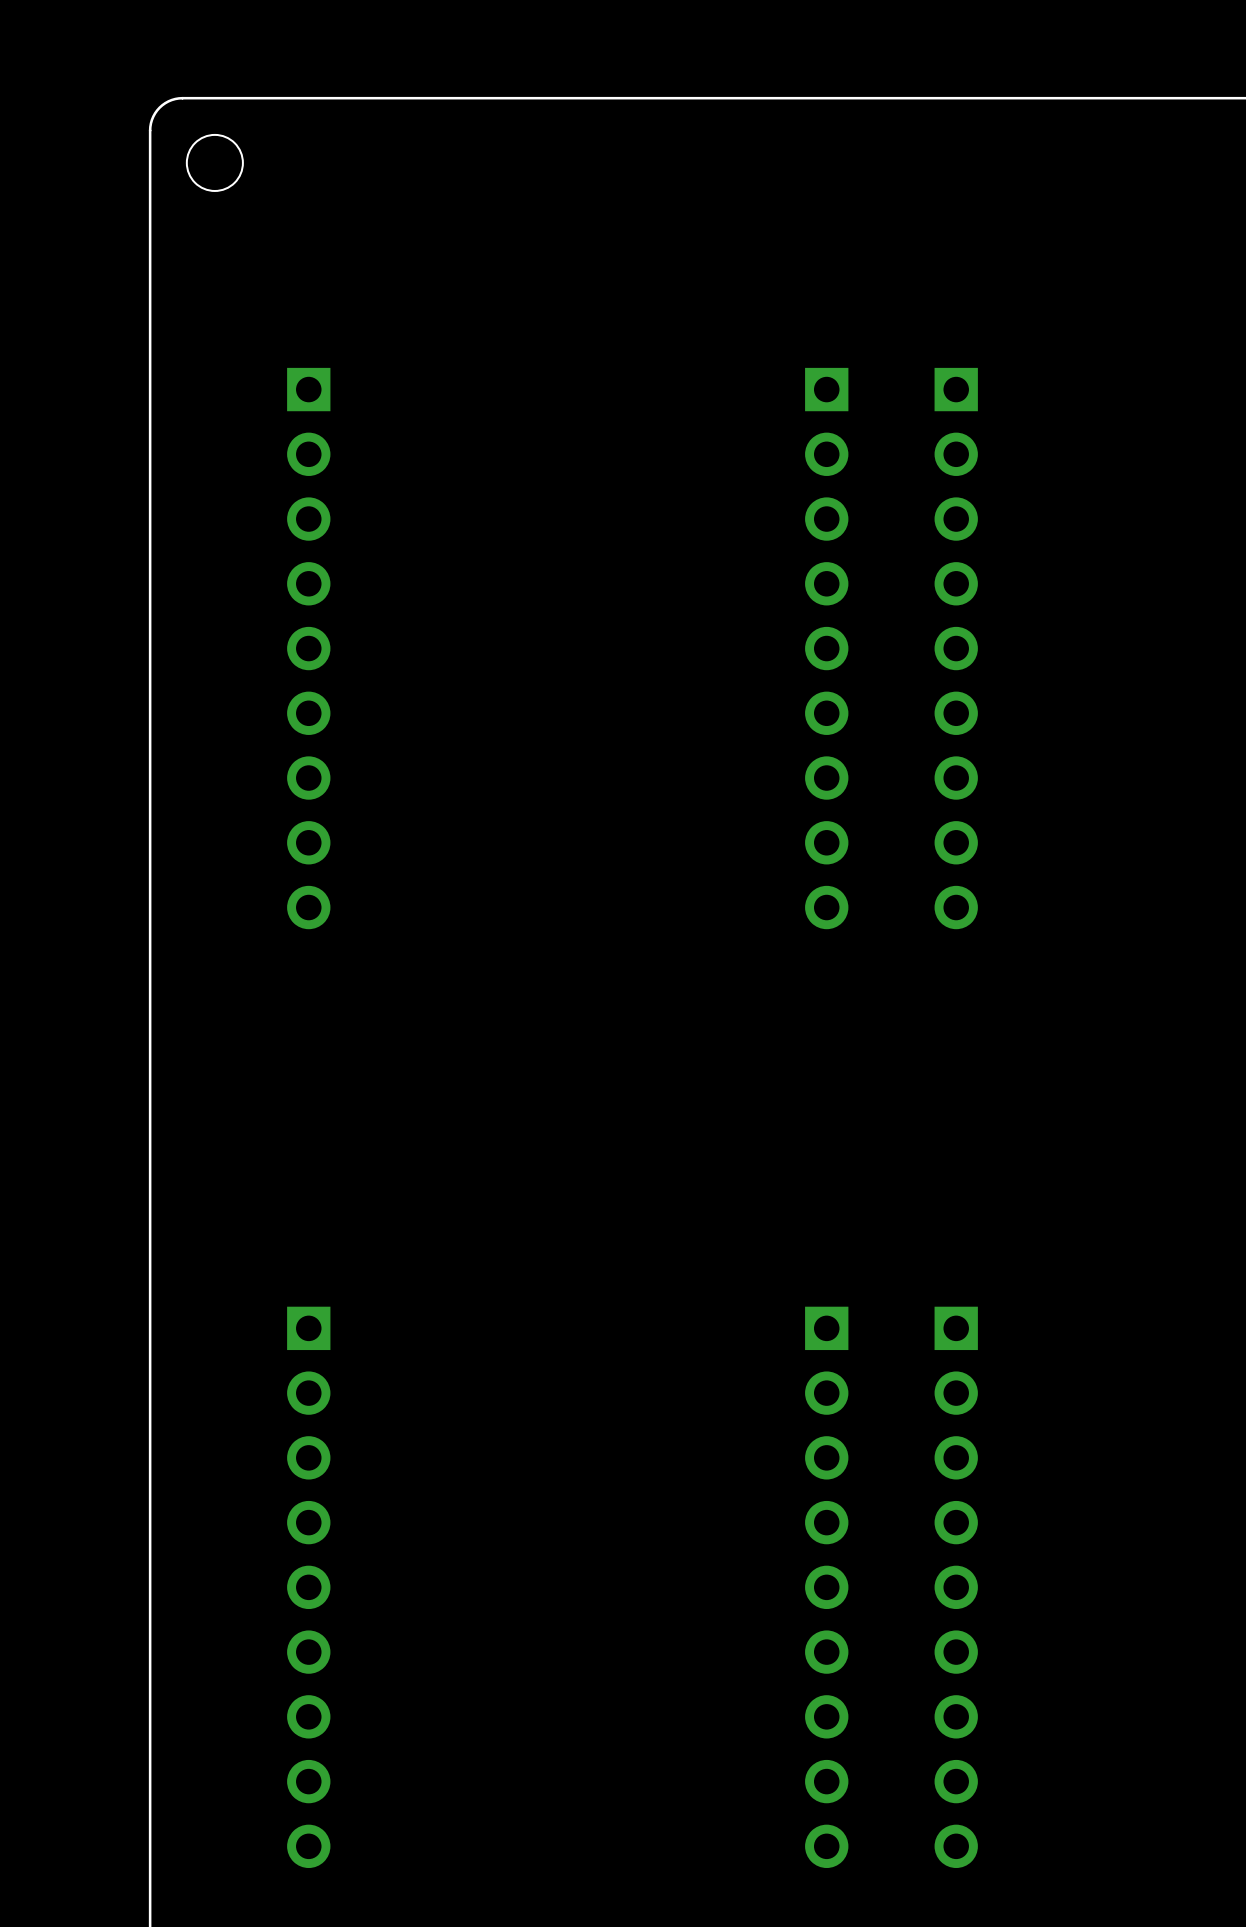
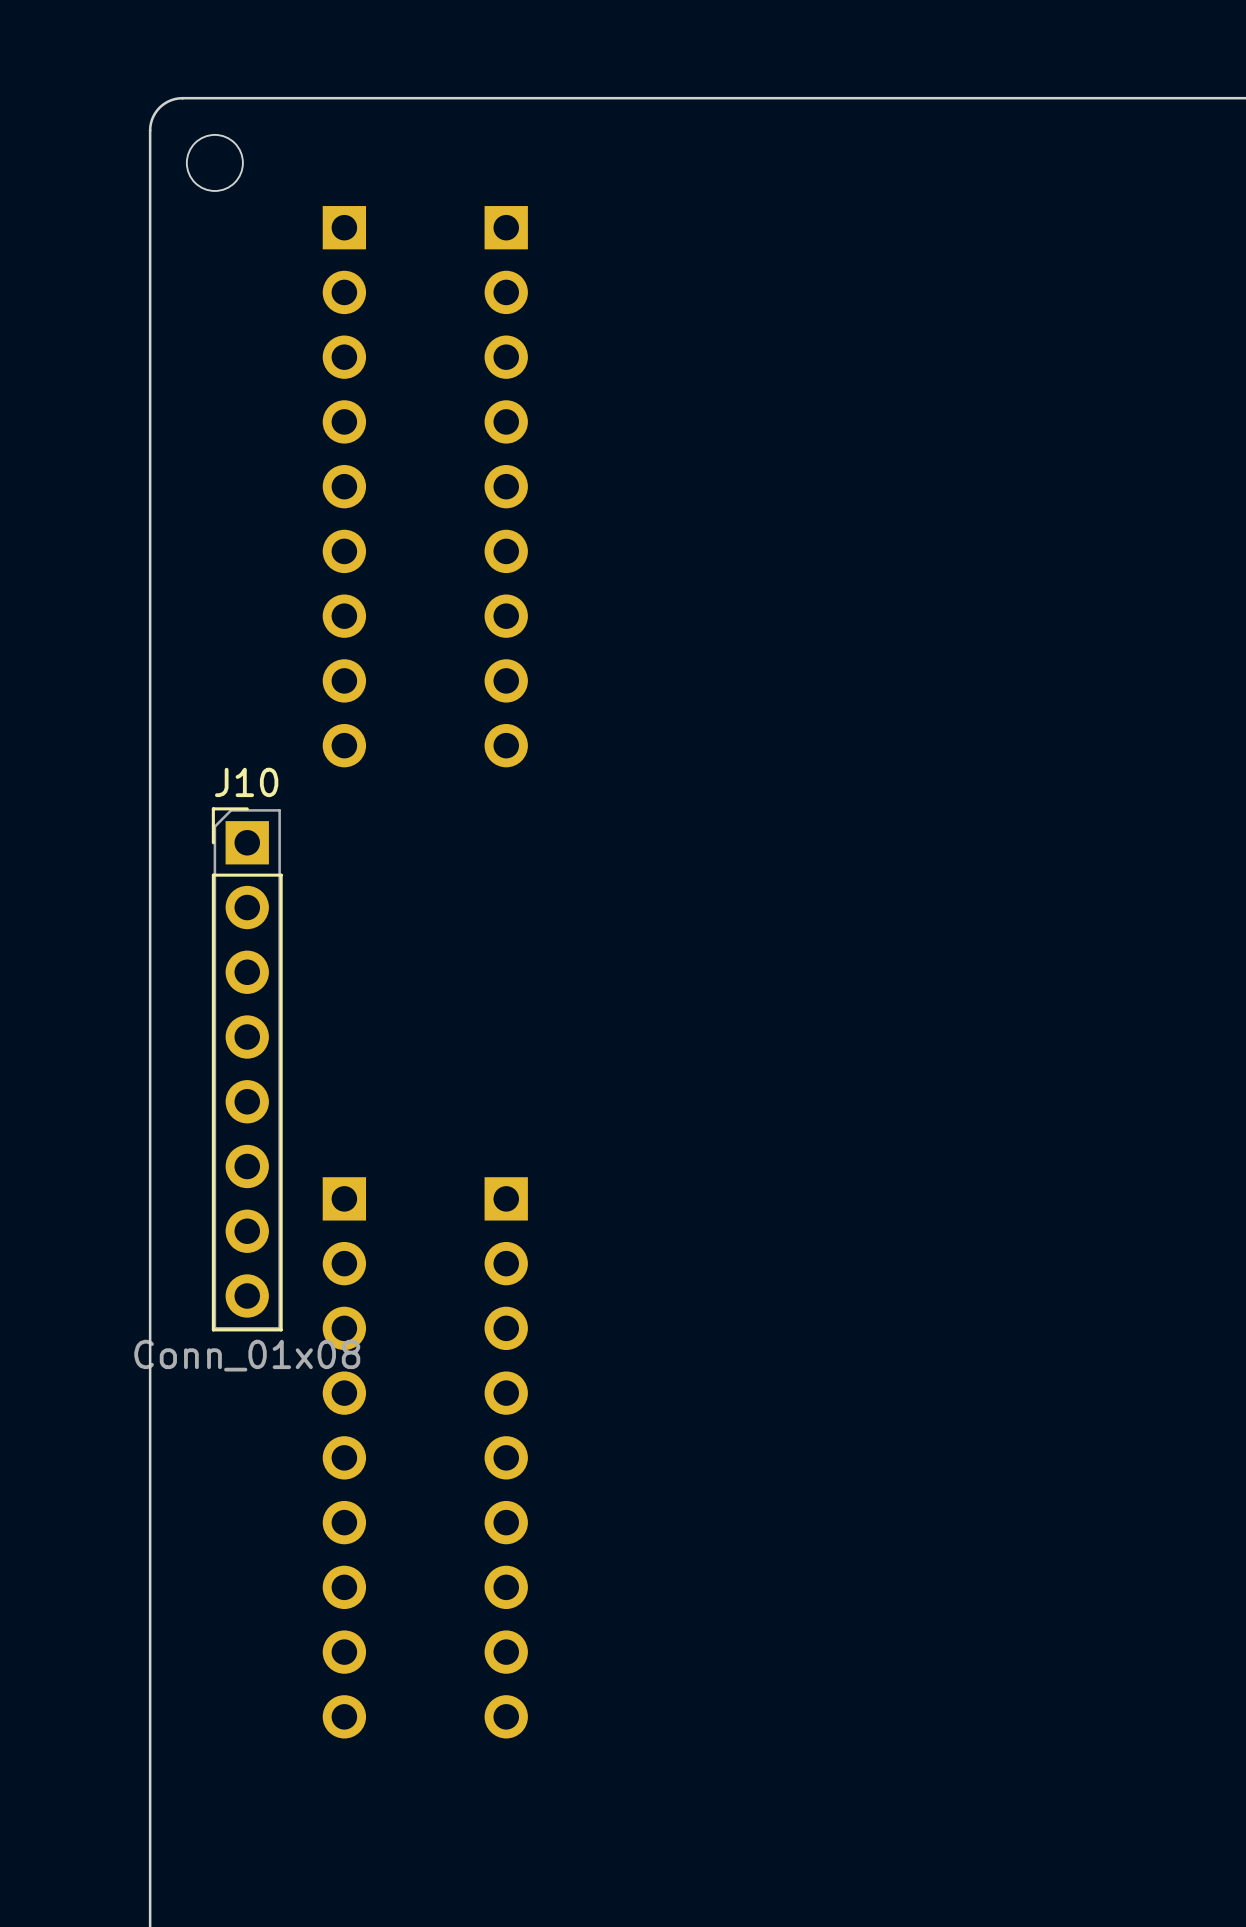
part: none -> (344, 486)
part: none -> (506, 486)
part: (308, 648) -> none
part: (826, 648) -> none
part: (956, 648) -> none
J10: none -> Conn_01x08 (247, 1069)
part: none -> (344, 1457)
part: none -> (506, 1457)
part: (308, 1587) -> none
part: (826, 1587) -> none
part: (956, 1587) -> none

